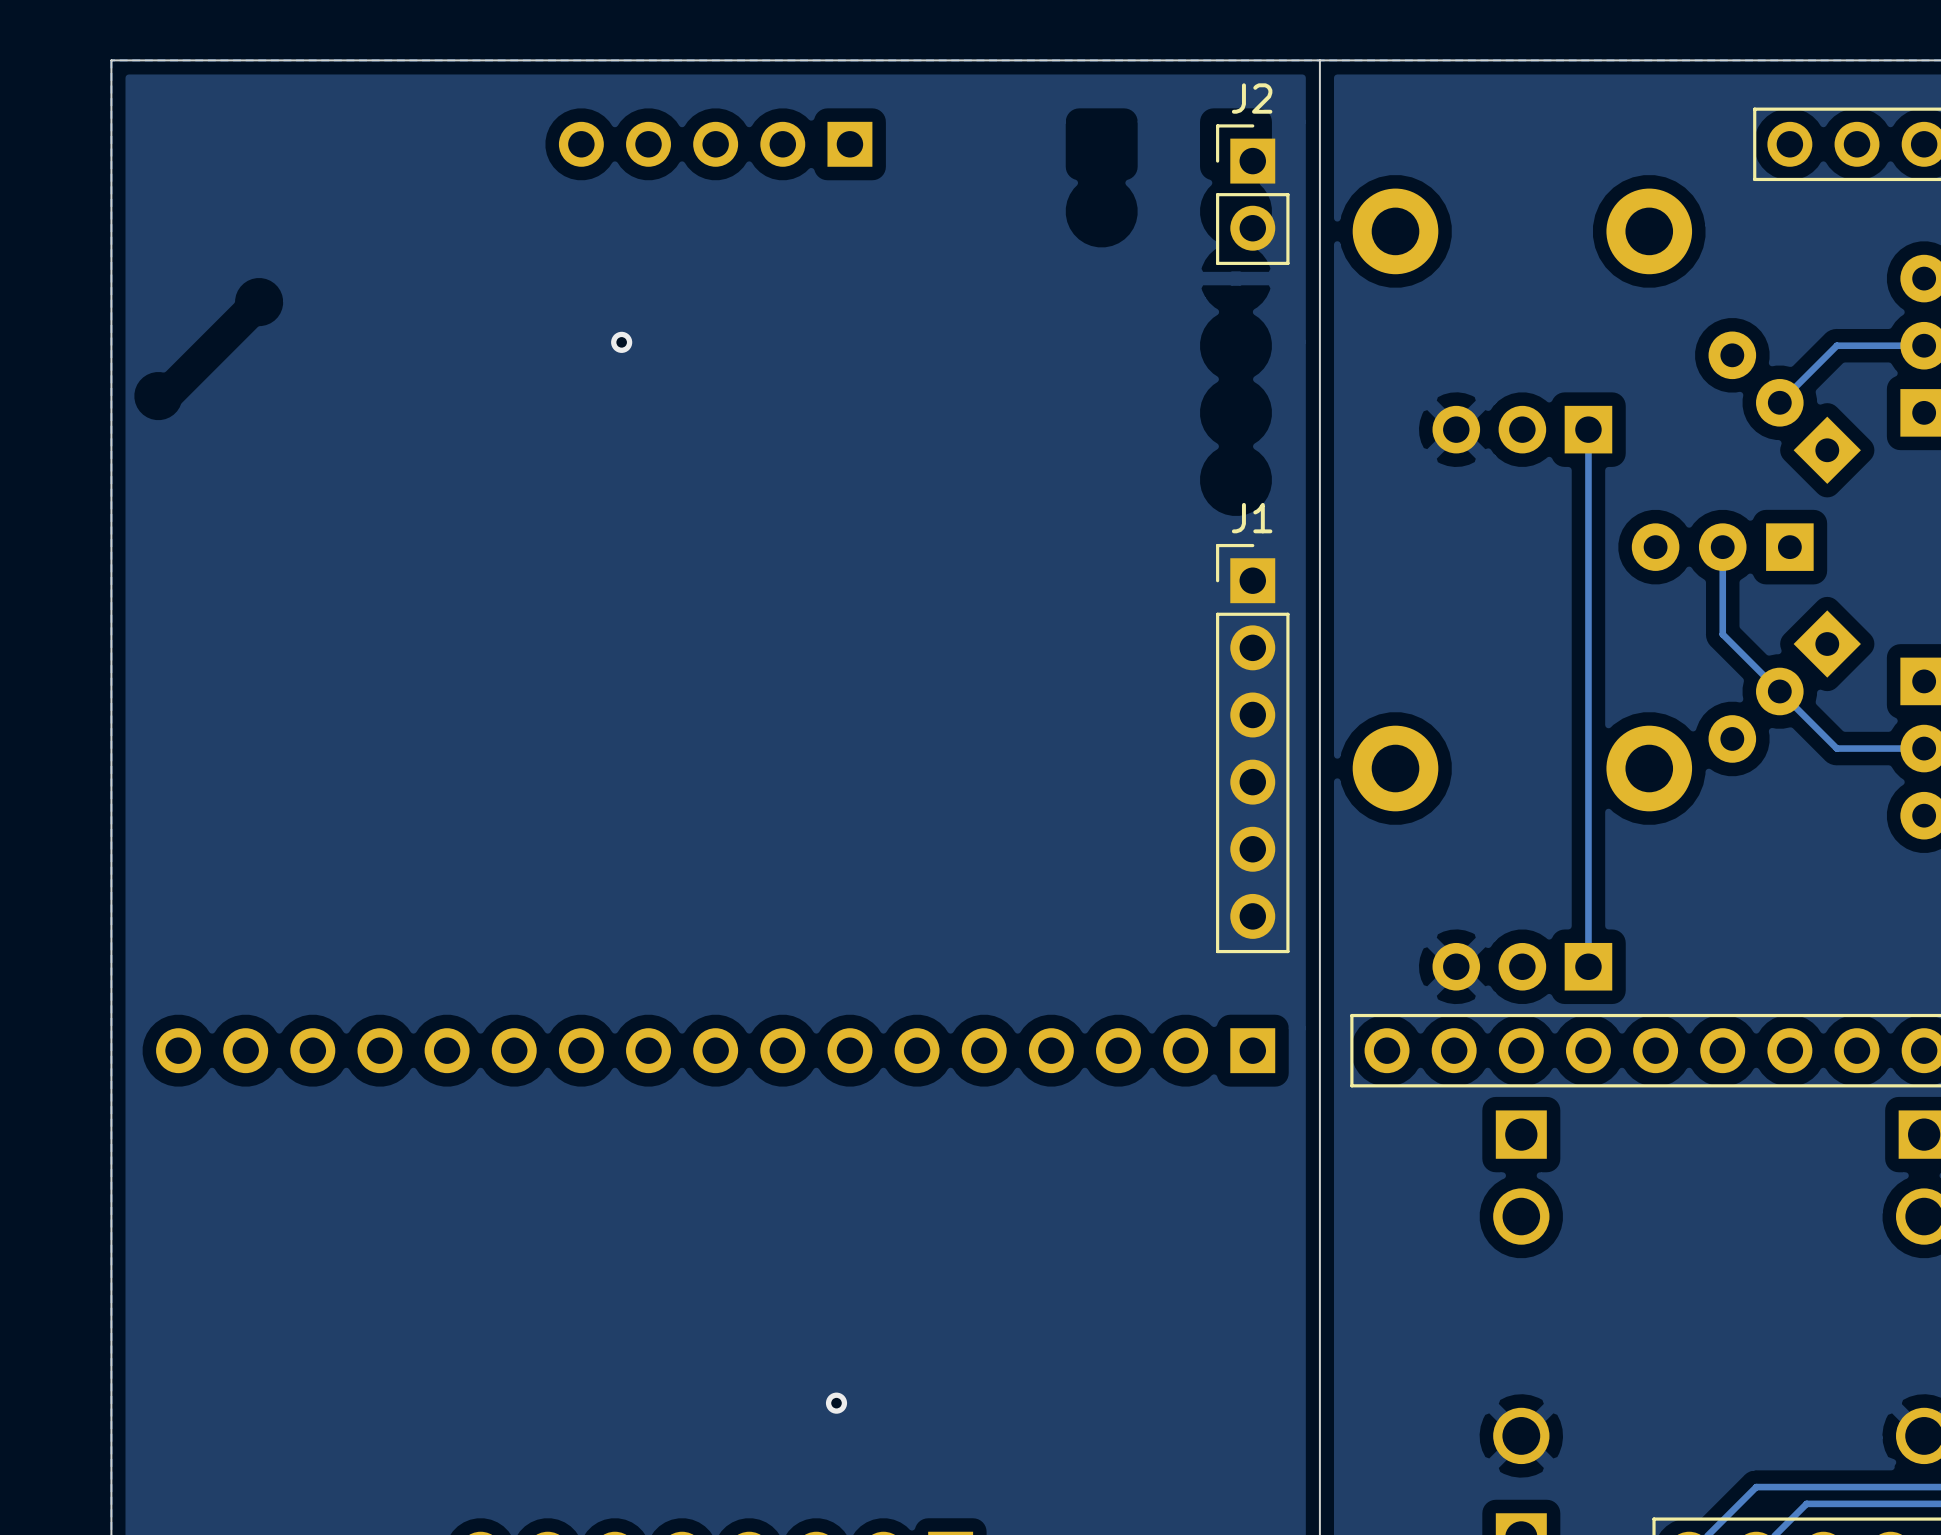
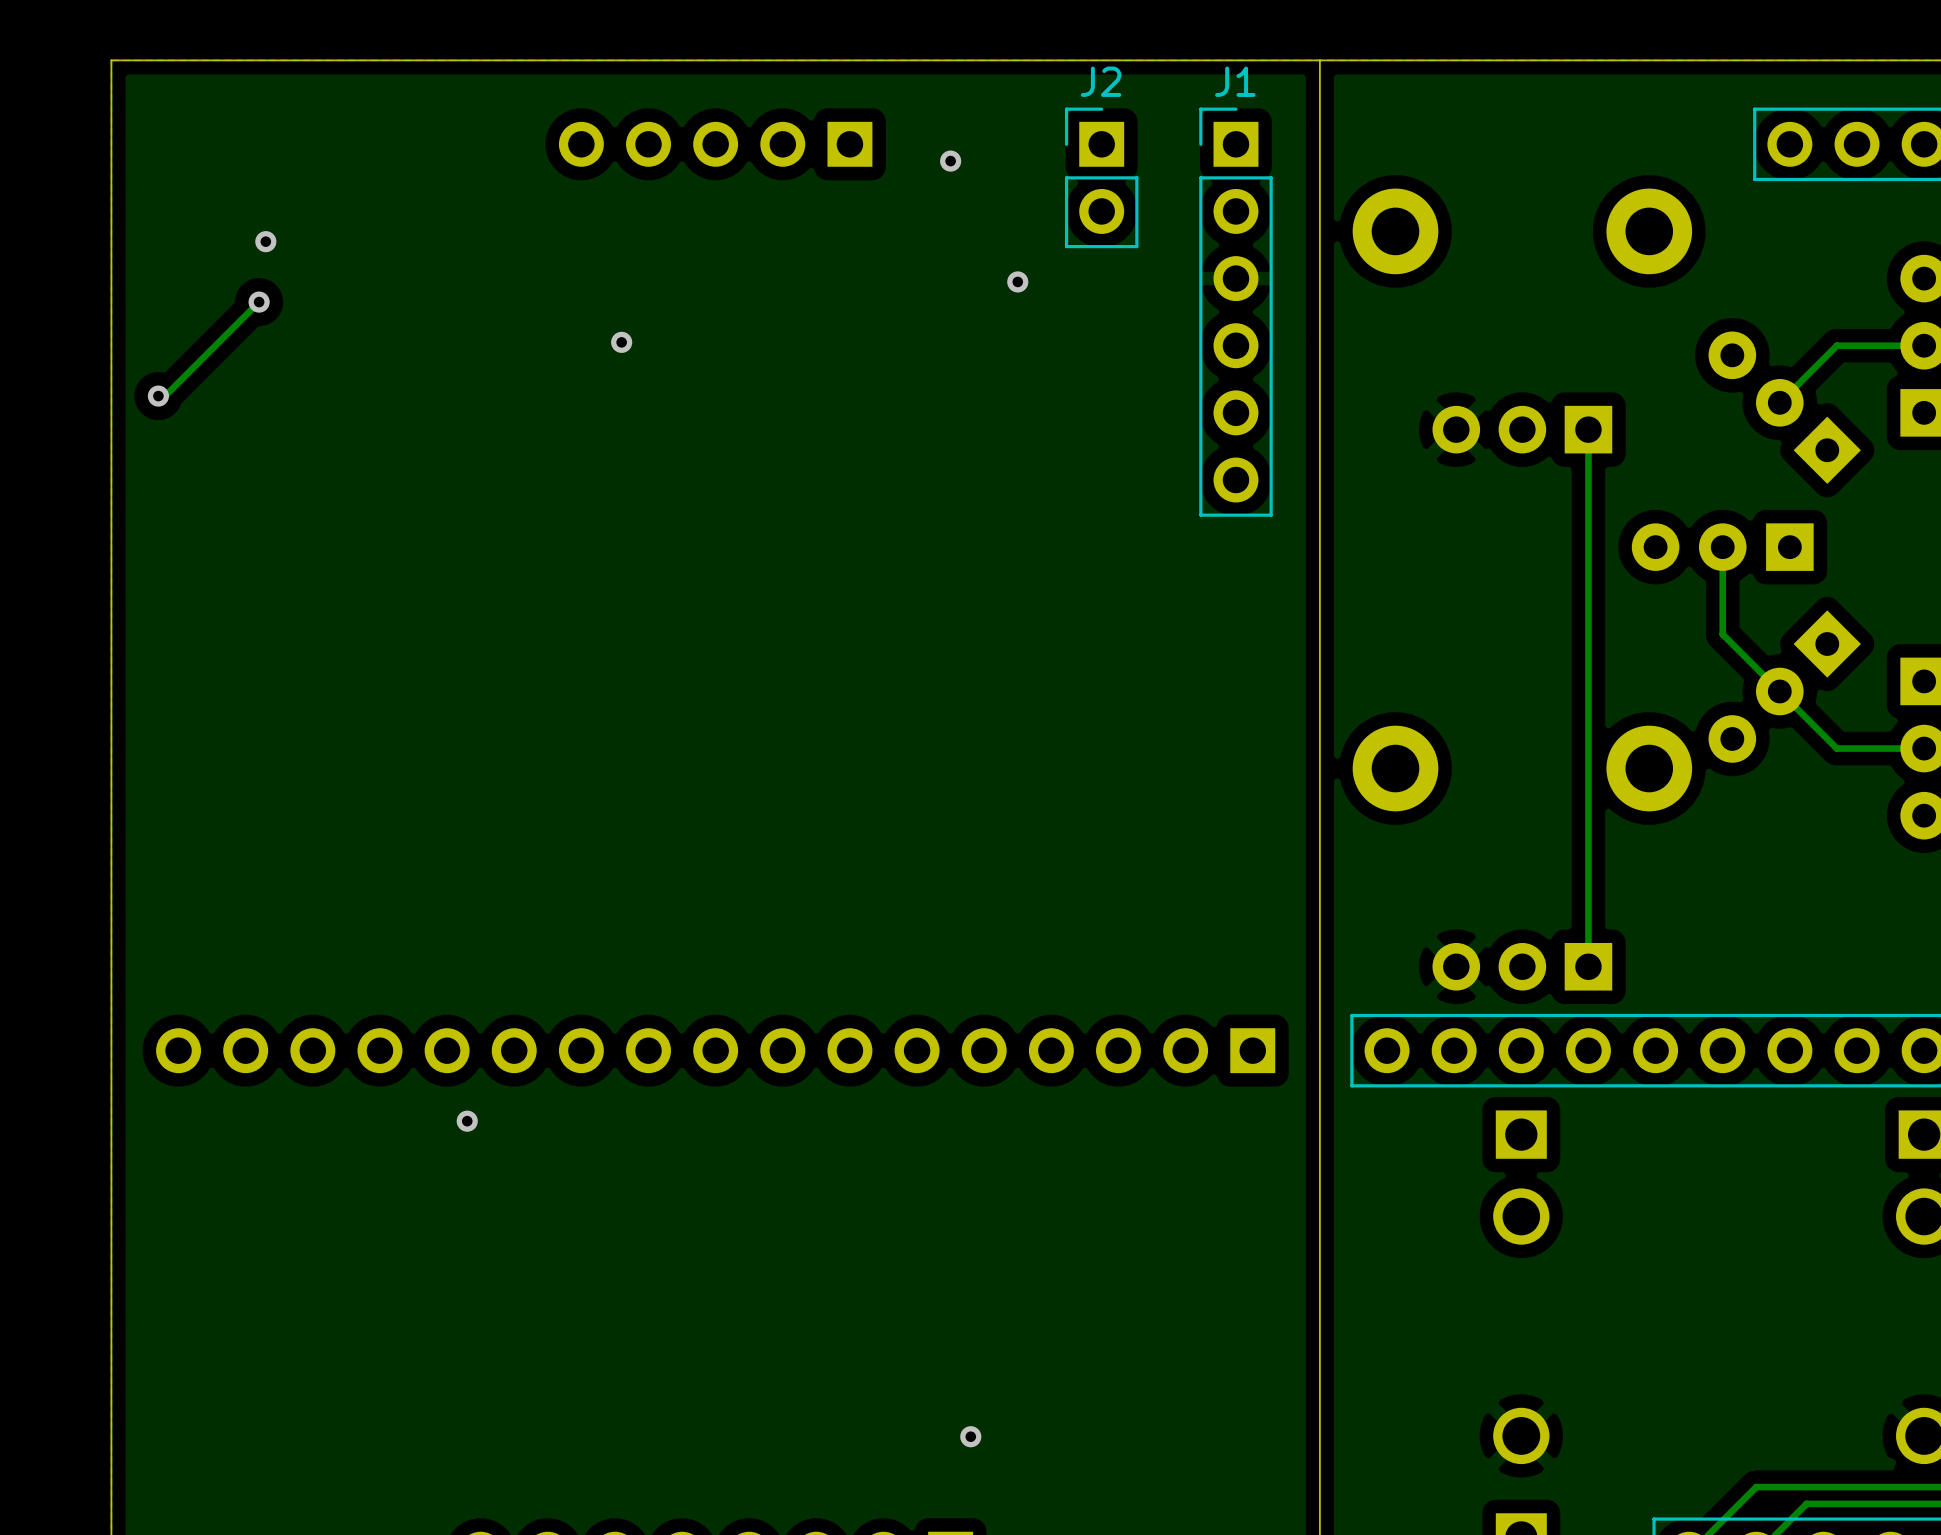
via: none -> (950, 161)
J2 position: (1252, 194) -> (1101, 177)
via: none -> (265, 241)
via: none -> (1017, 281)
track: none -> (259, 302) (165, 396) (158, 396)
via: none -> (259, 302)
via: none -> (158, 396)
J1 position: (1252, 748) -> (1235, 312)
via: none -> (467, 1121)
via position: (836, 1403) -> (970, 1436)

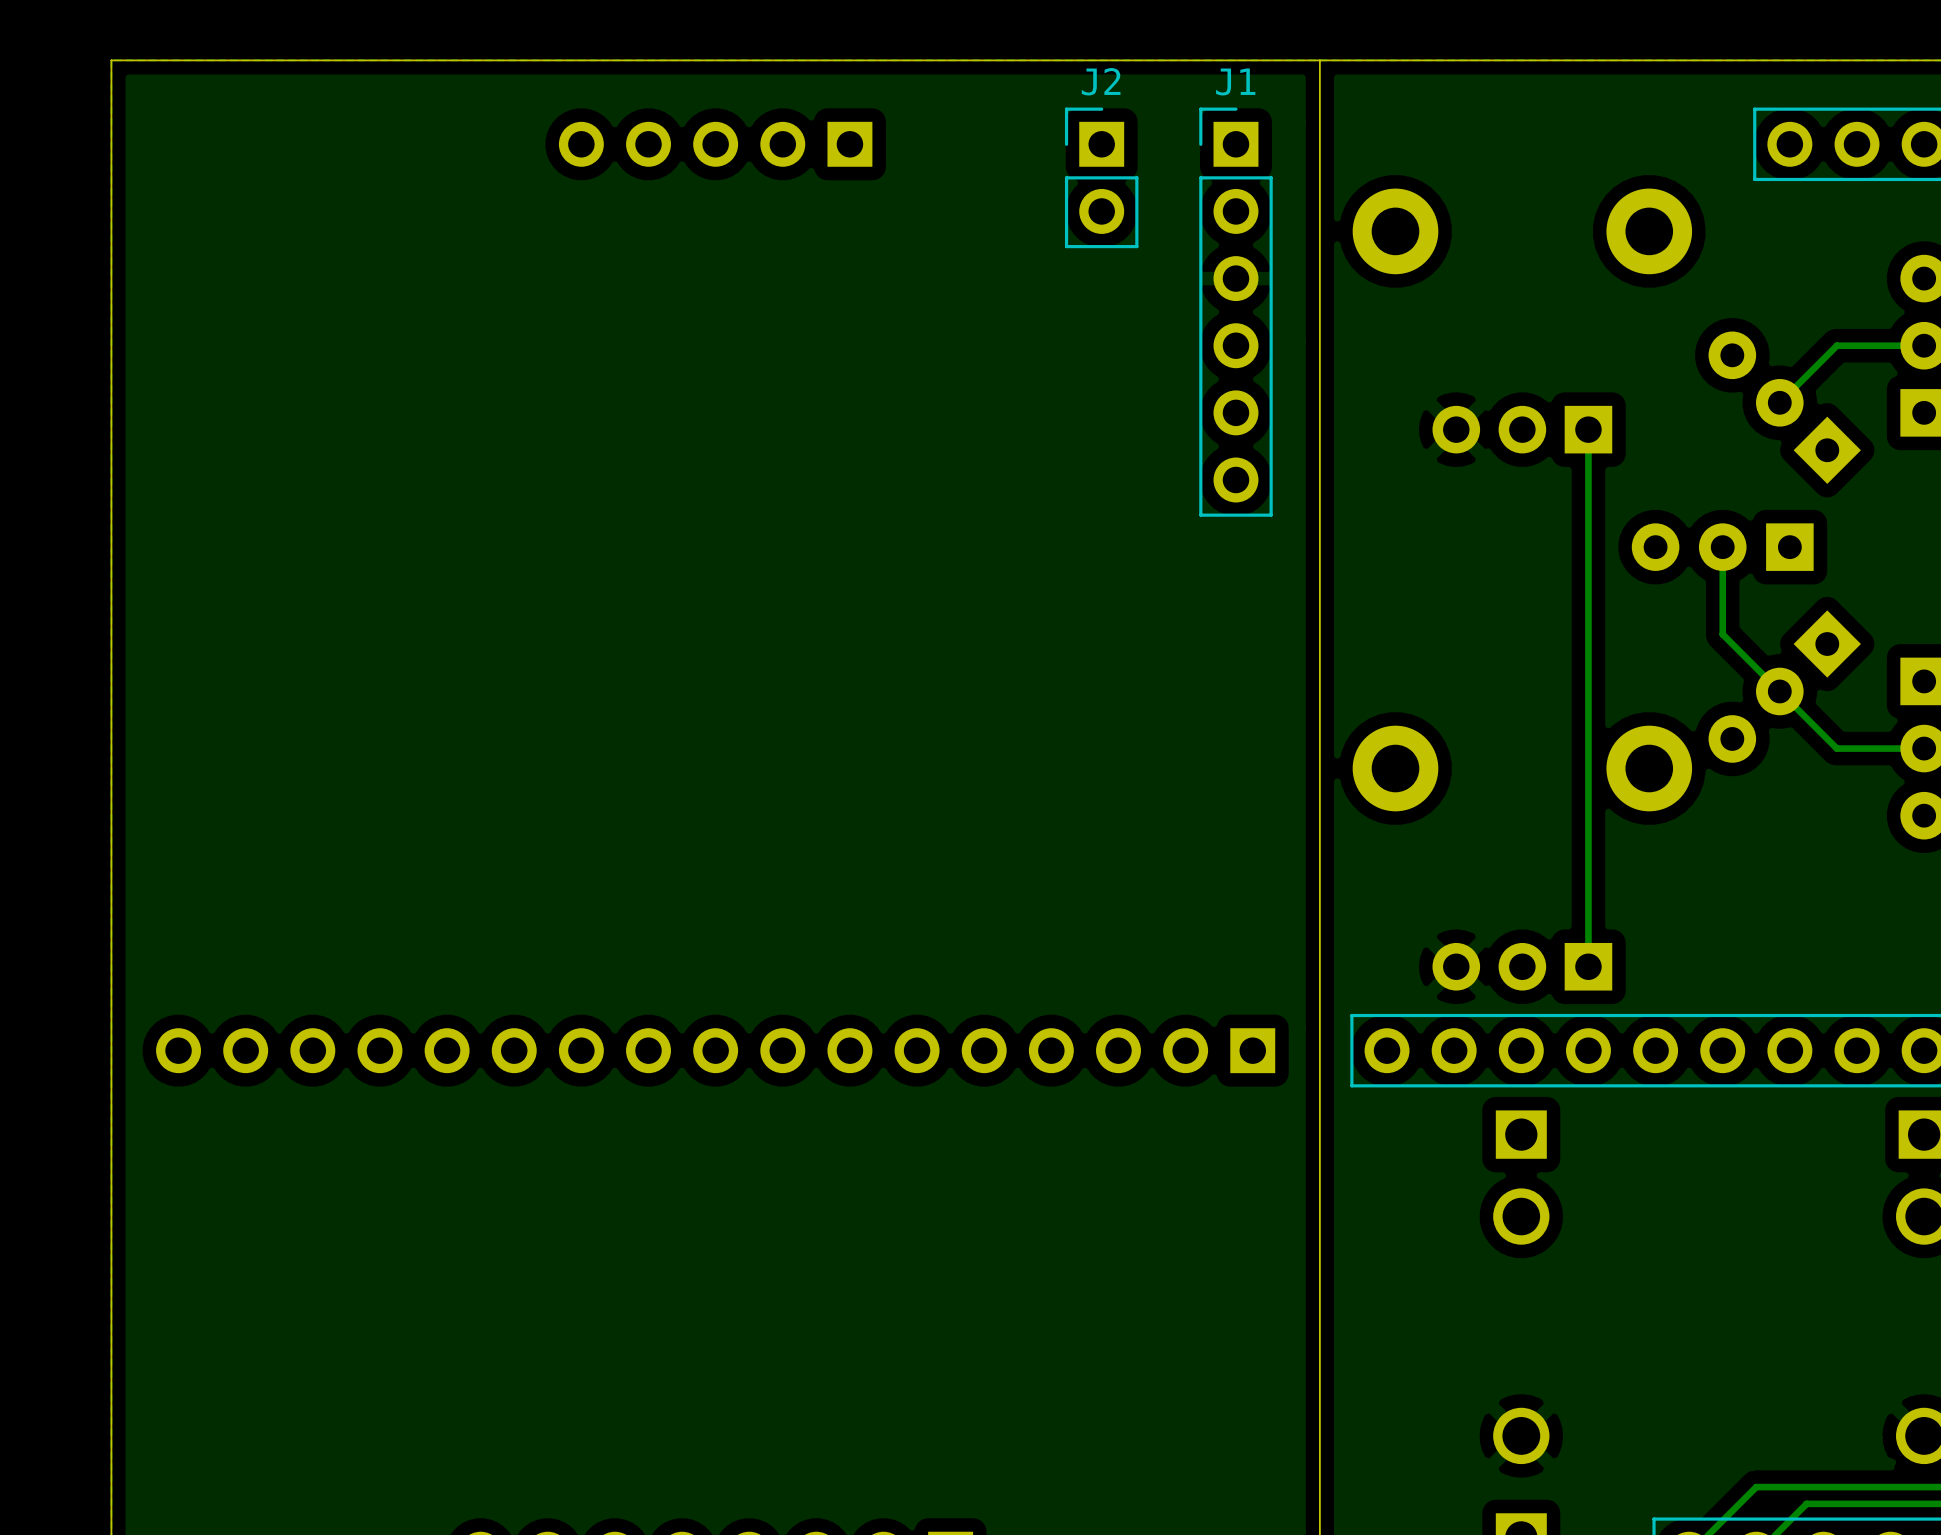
via: (950, 161) -> none
via: (265, 241) -> none
via: (1017, 281) -> none
track: (259, 302) (165, 396) (158, 396) -> none
via: (259, 302) -> none
via: (621, 342) -> none
via: (158, 396) -> none
via: (467, 1121) -> none
via: (970, 1436) -> none

